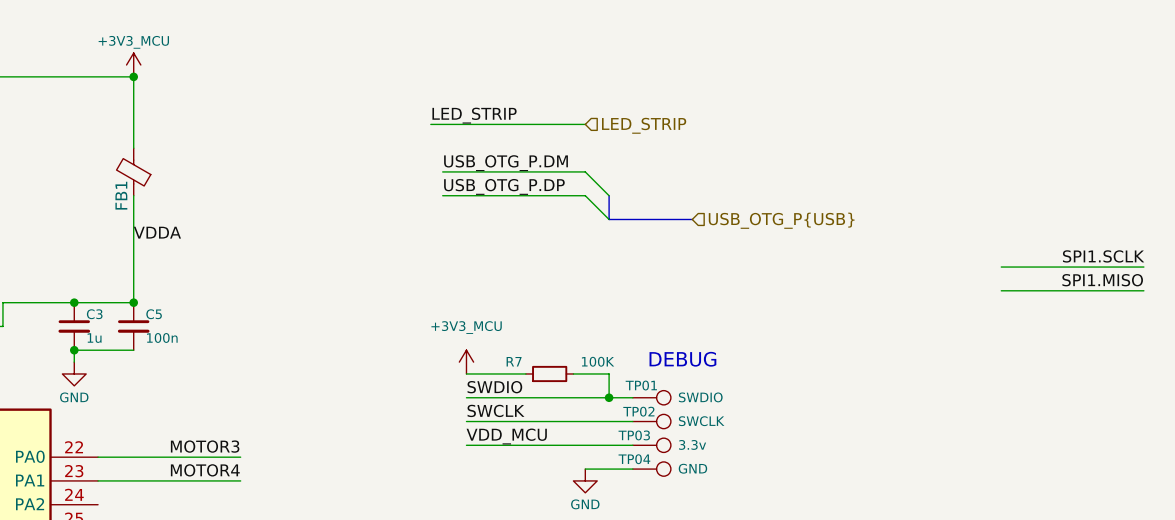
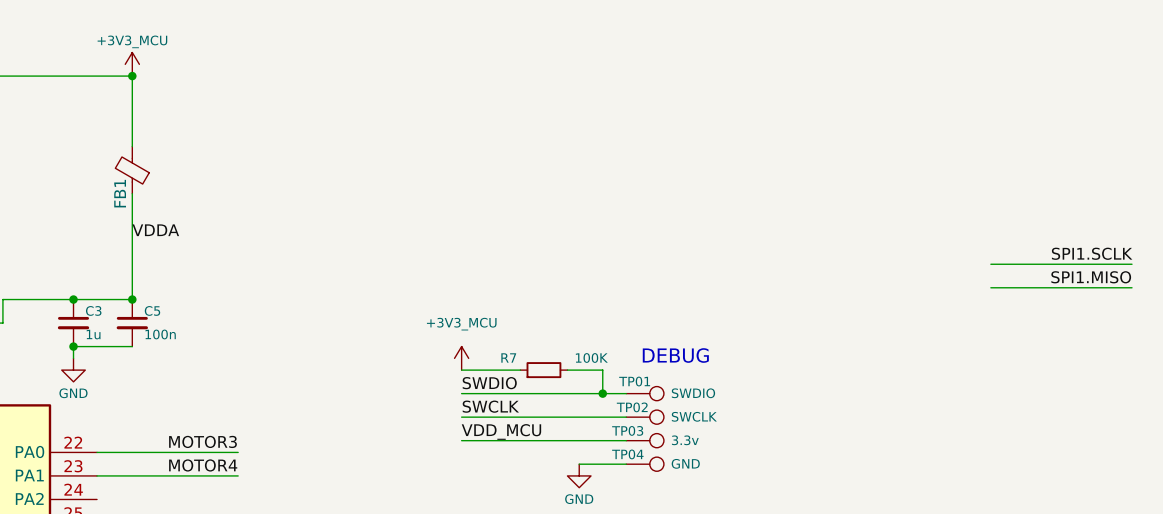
label: LED_STRIP (474, 115) -> none
wire: (430, 124) (585, 124) -> none
hierarchical label: LED_STRIP (644, 125) -> none
label: USB_OTG_P.DM (506, 163) -> none
wire: (442, 171) (585, 171) (609, 195) -> none
label: USB_OTG_P.DP (504, 186) -> none
wire: (442, 195) (585, 195) (609, 219) -> none
bus: (609, 195) (609, 219) (692, 219) -> none
hierarchical label: USB_OTG_P{USB} (781, 220) -> none

